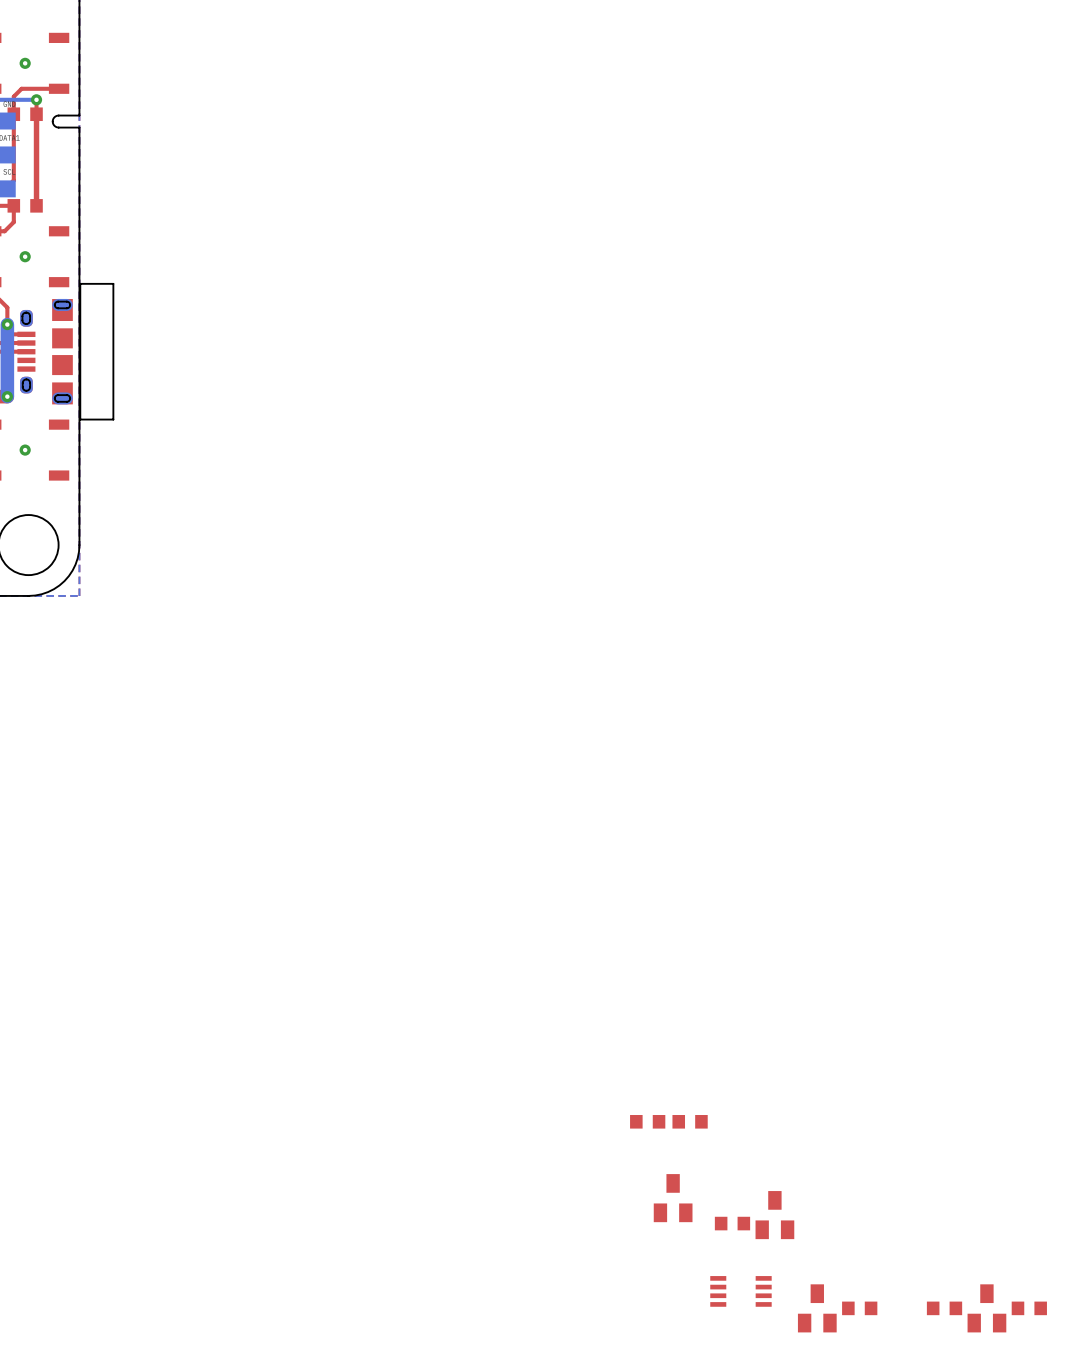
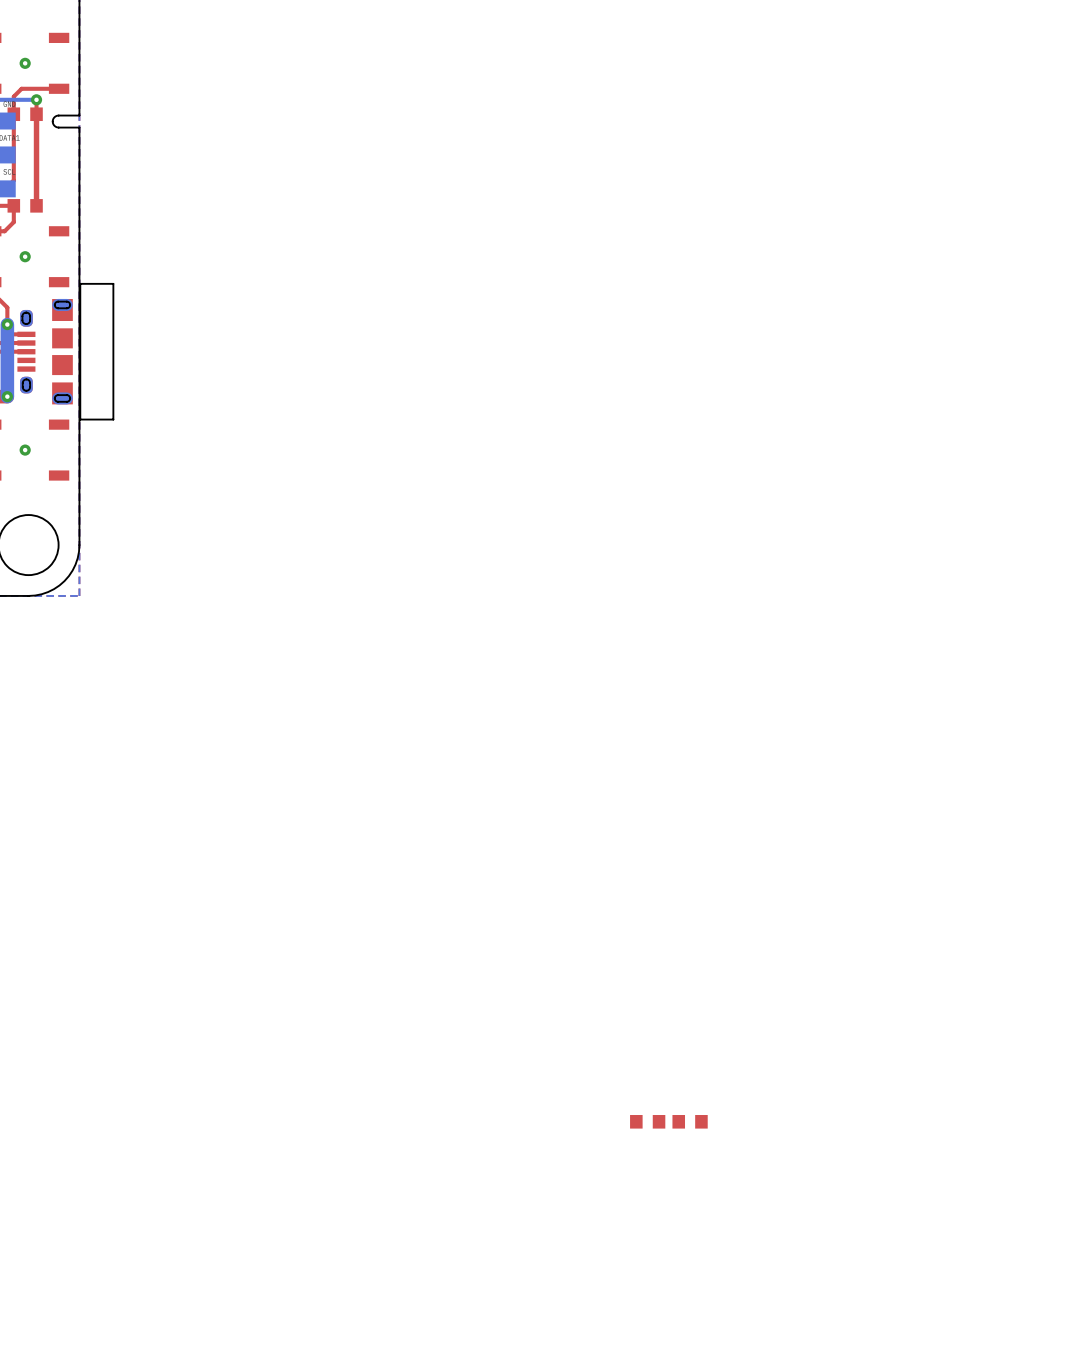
part: (673, 1198) -> none
part: (774, 1215) -> none
part: (732, 1223) -> none
part: (740, 1291) -> none
part: (817, 1308) -> none
part: (859, 1308) -> none
part: (944, 1308) -> none
part: (986, 1308) -> none
part: (1029, 1308) -> none

